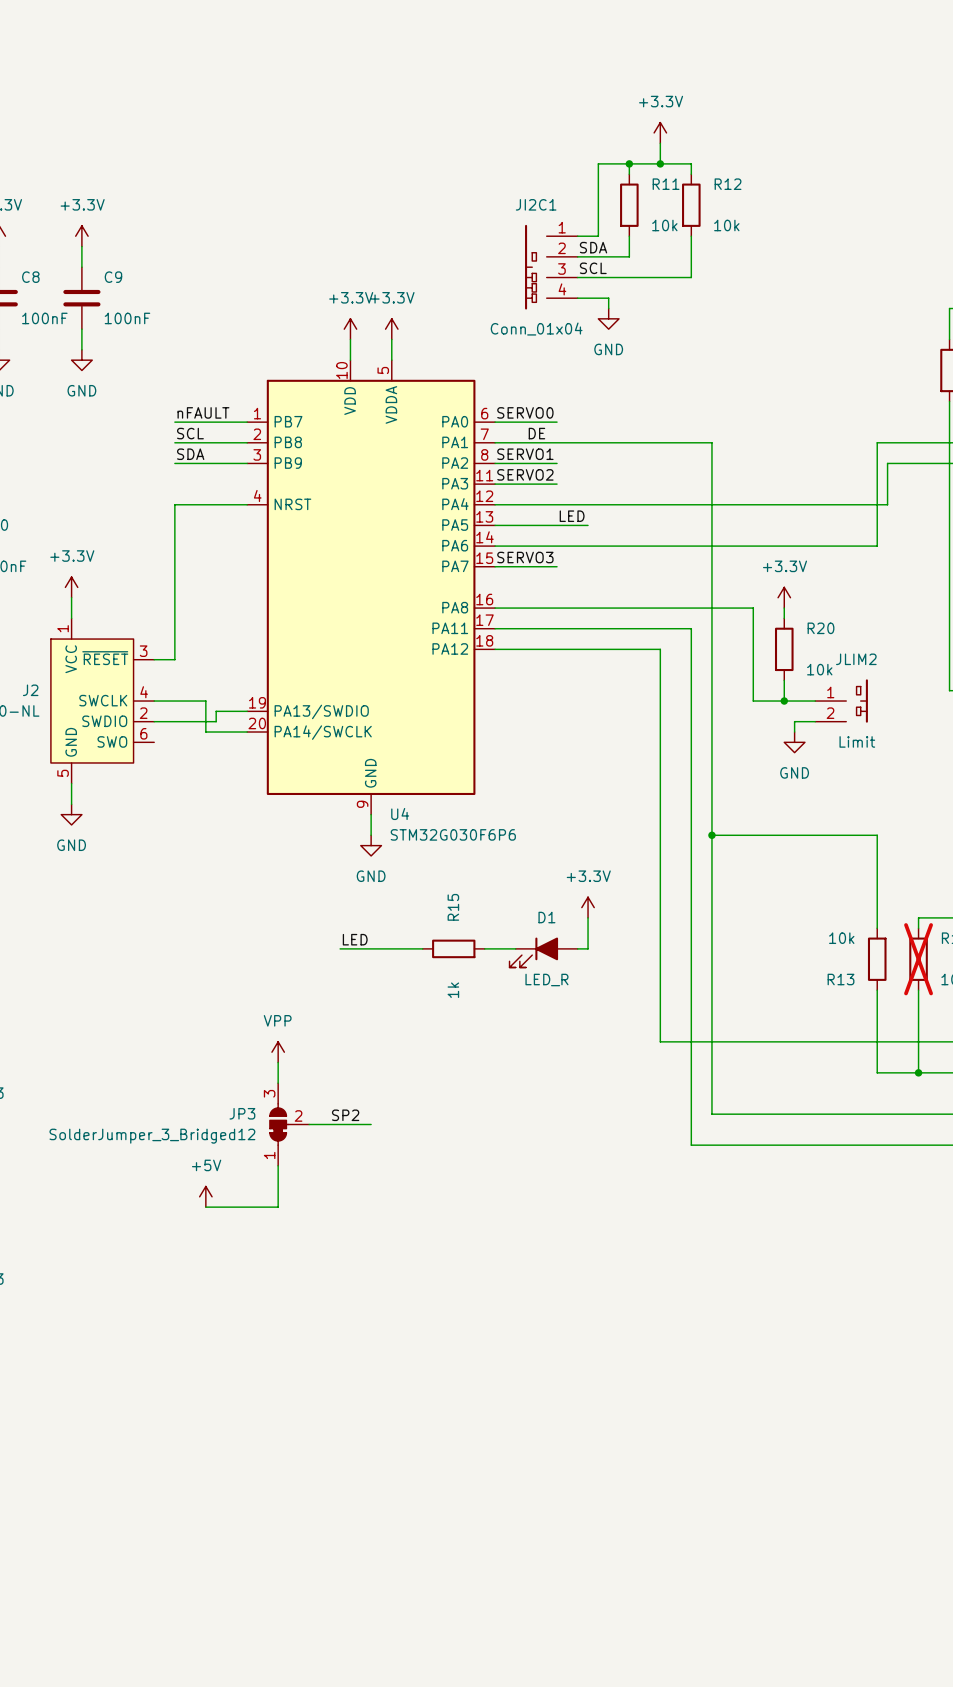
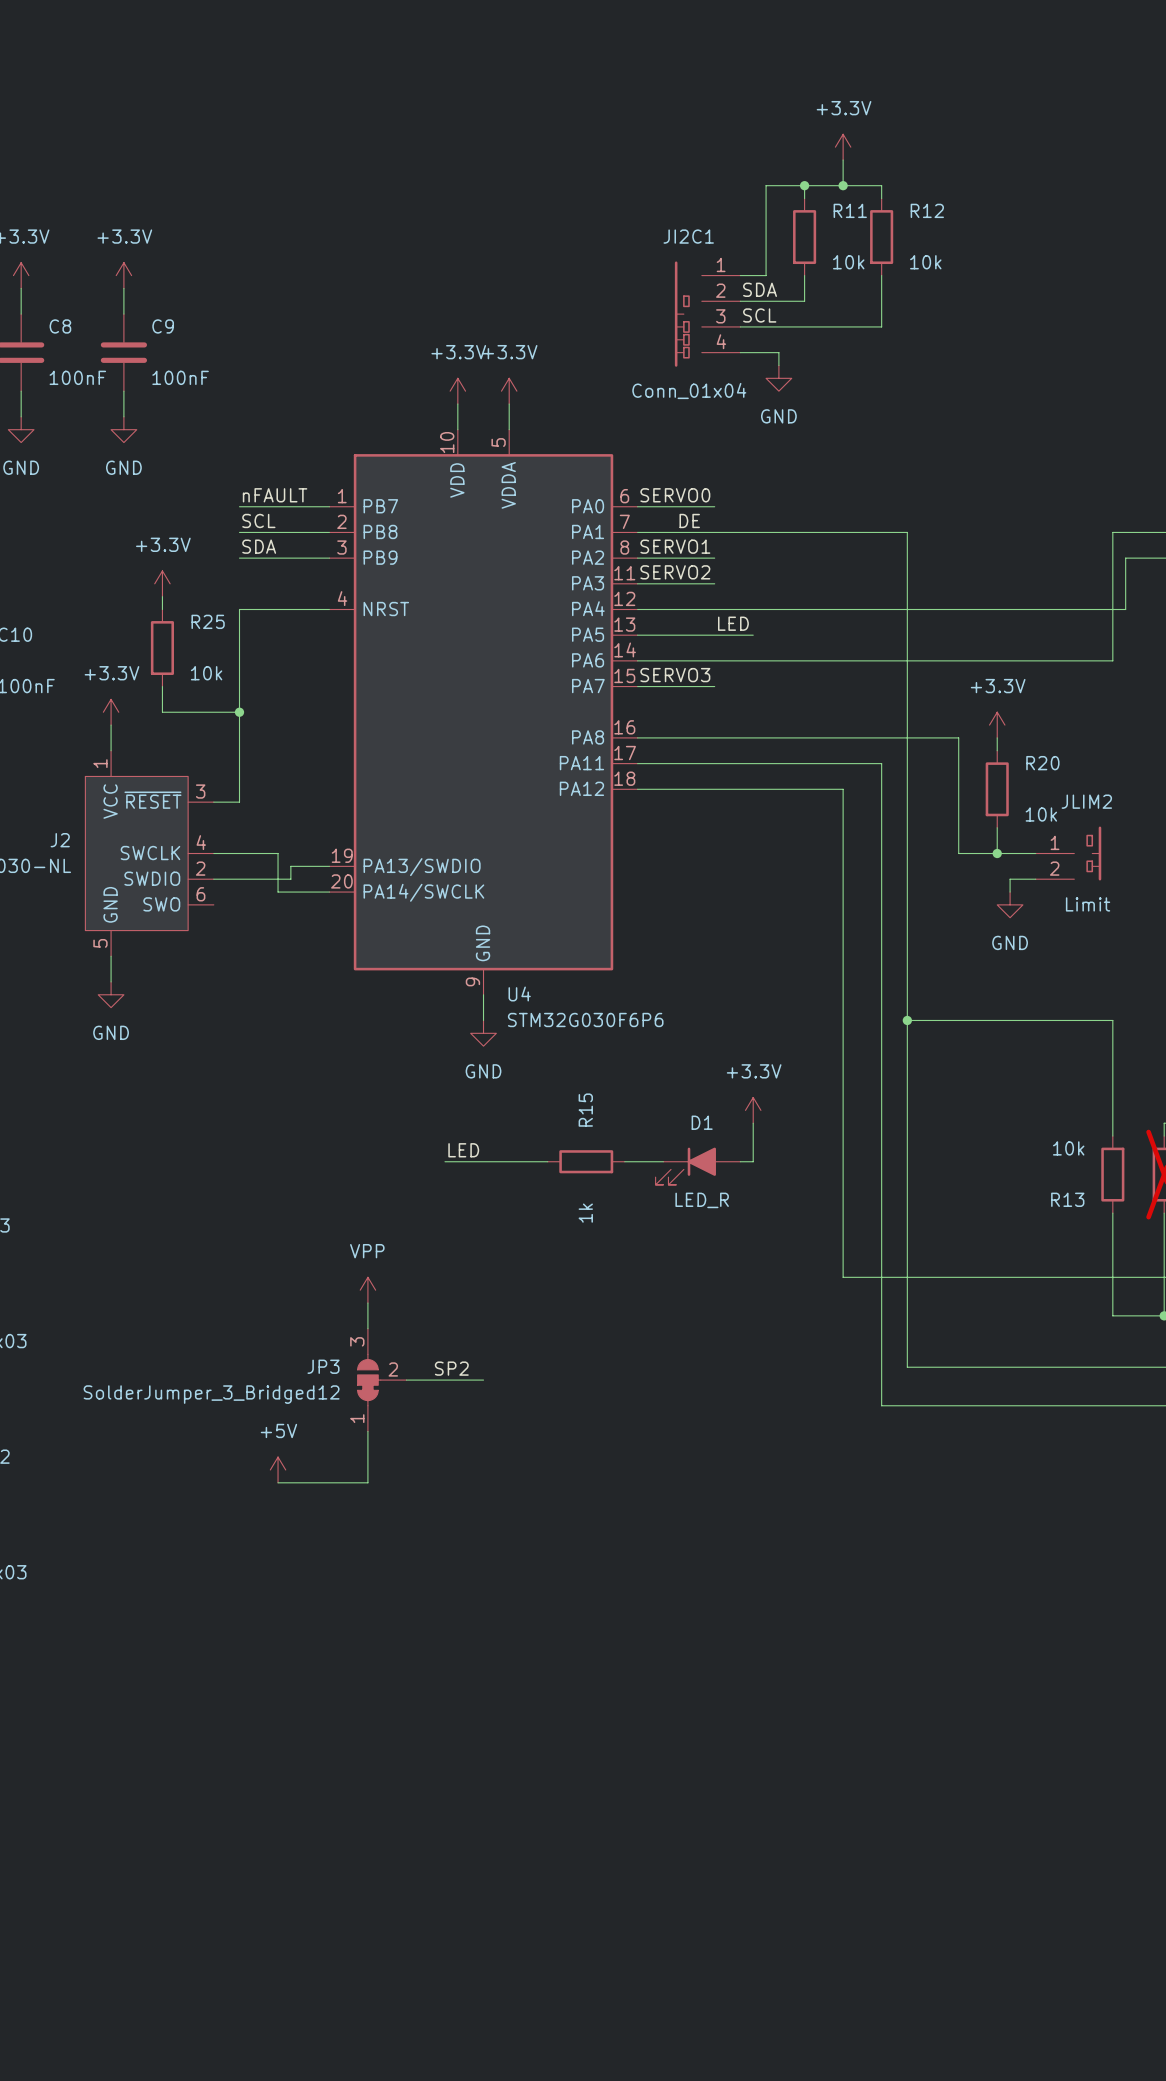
power symbol: none -> +3.3V (162, 583)
wire: none -> (162, 596) (162, 609)
R25: none -> 10k (162, 648)
wire: none -> (162, 686) (162, 712) (239, 712)
junction: none -> (239, 712)

